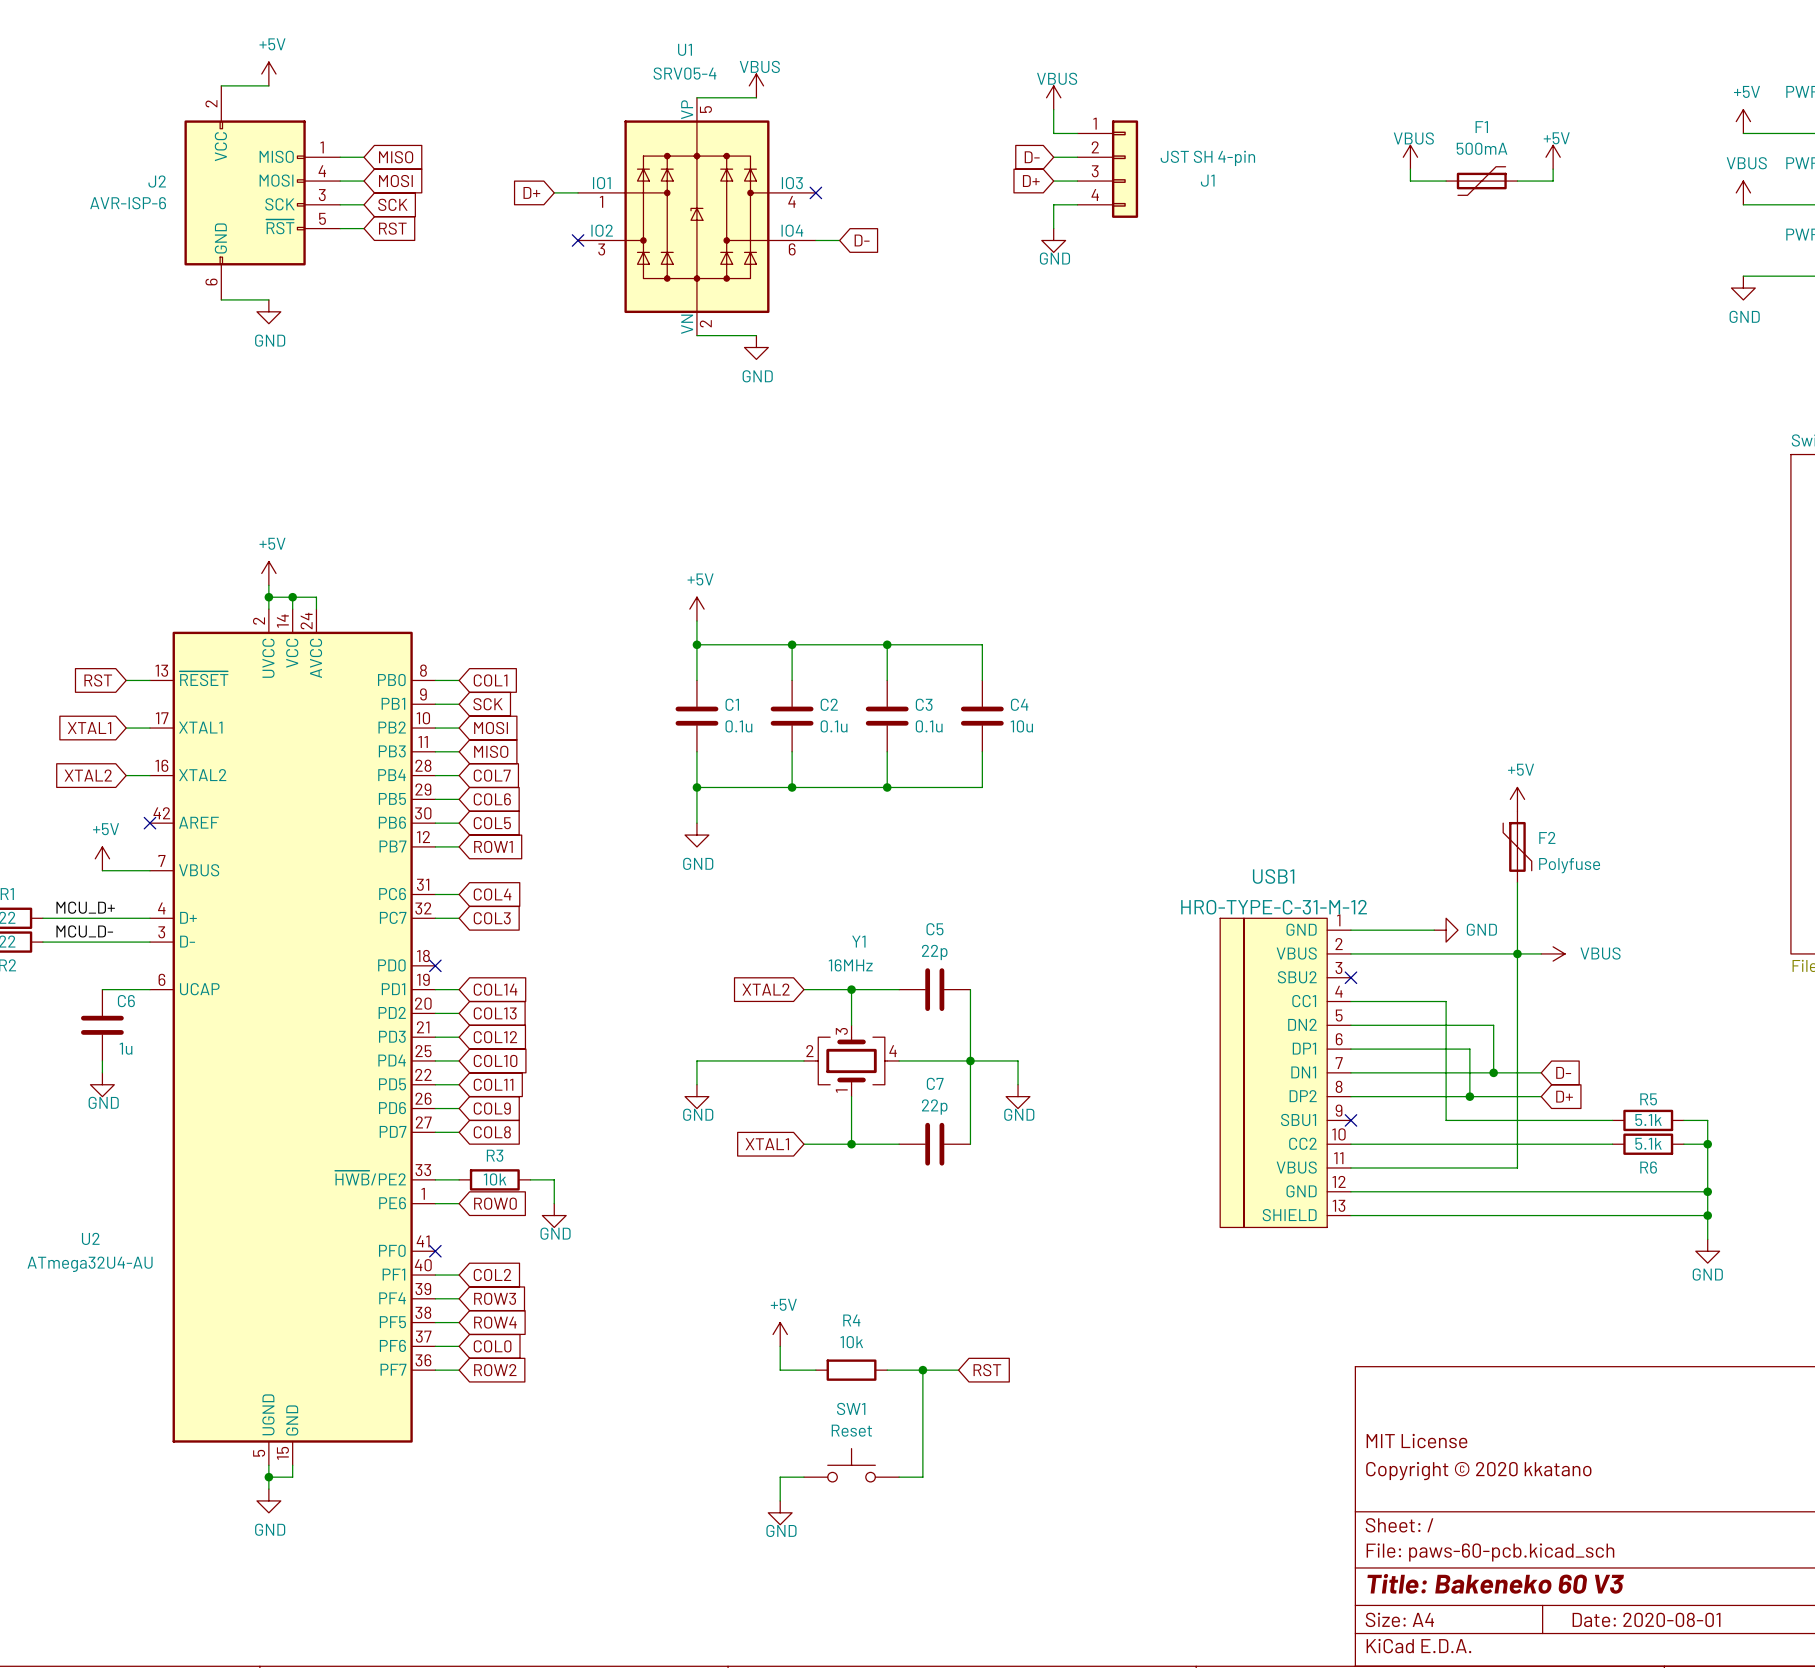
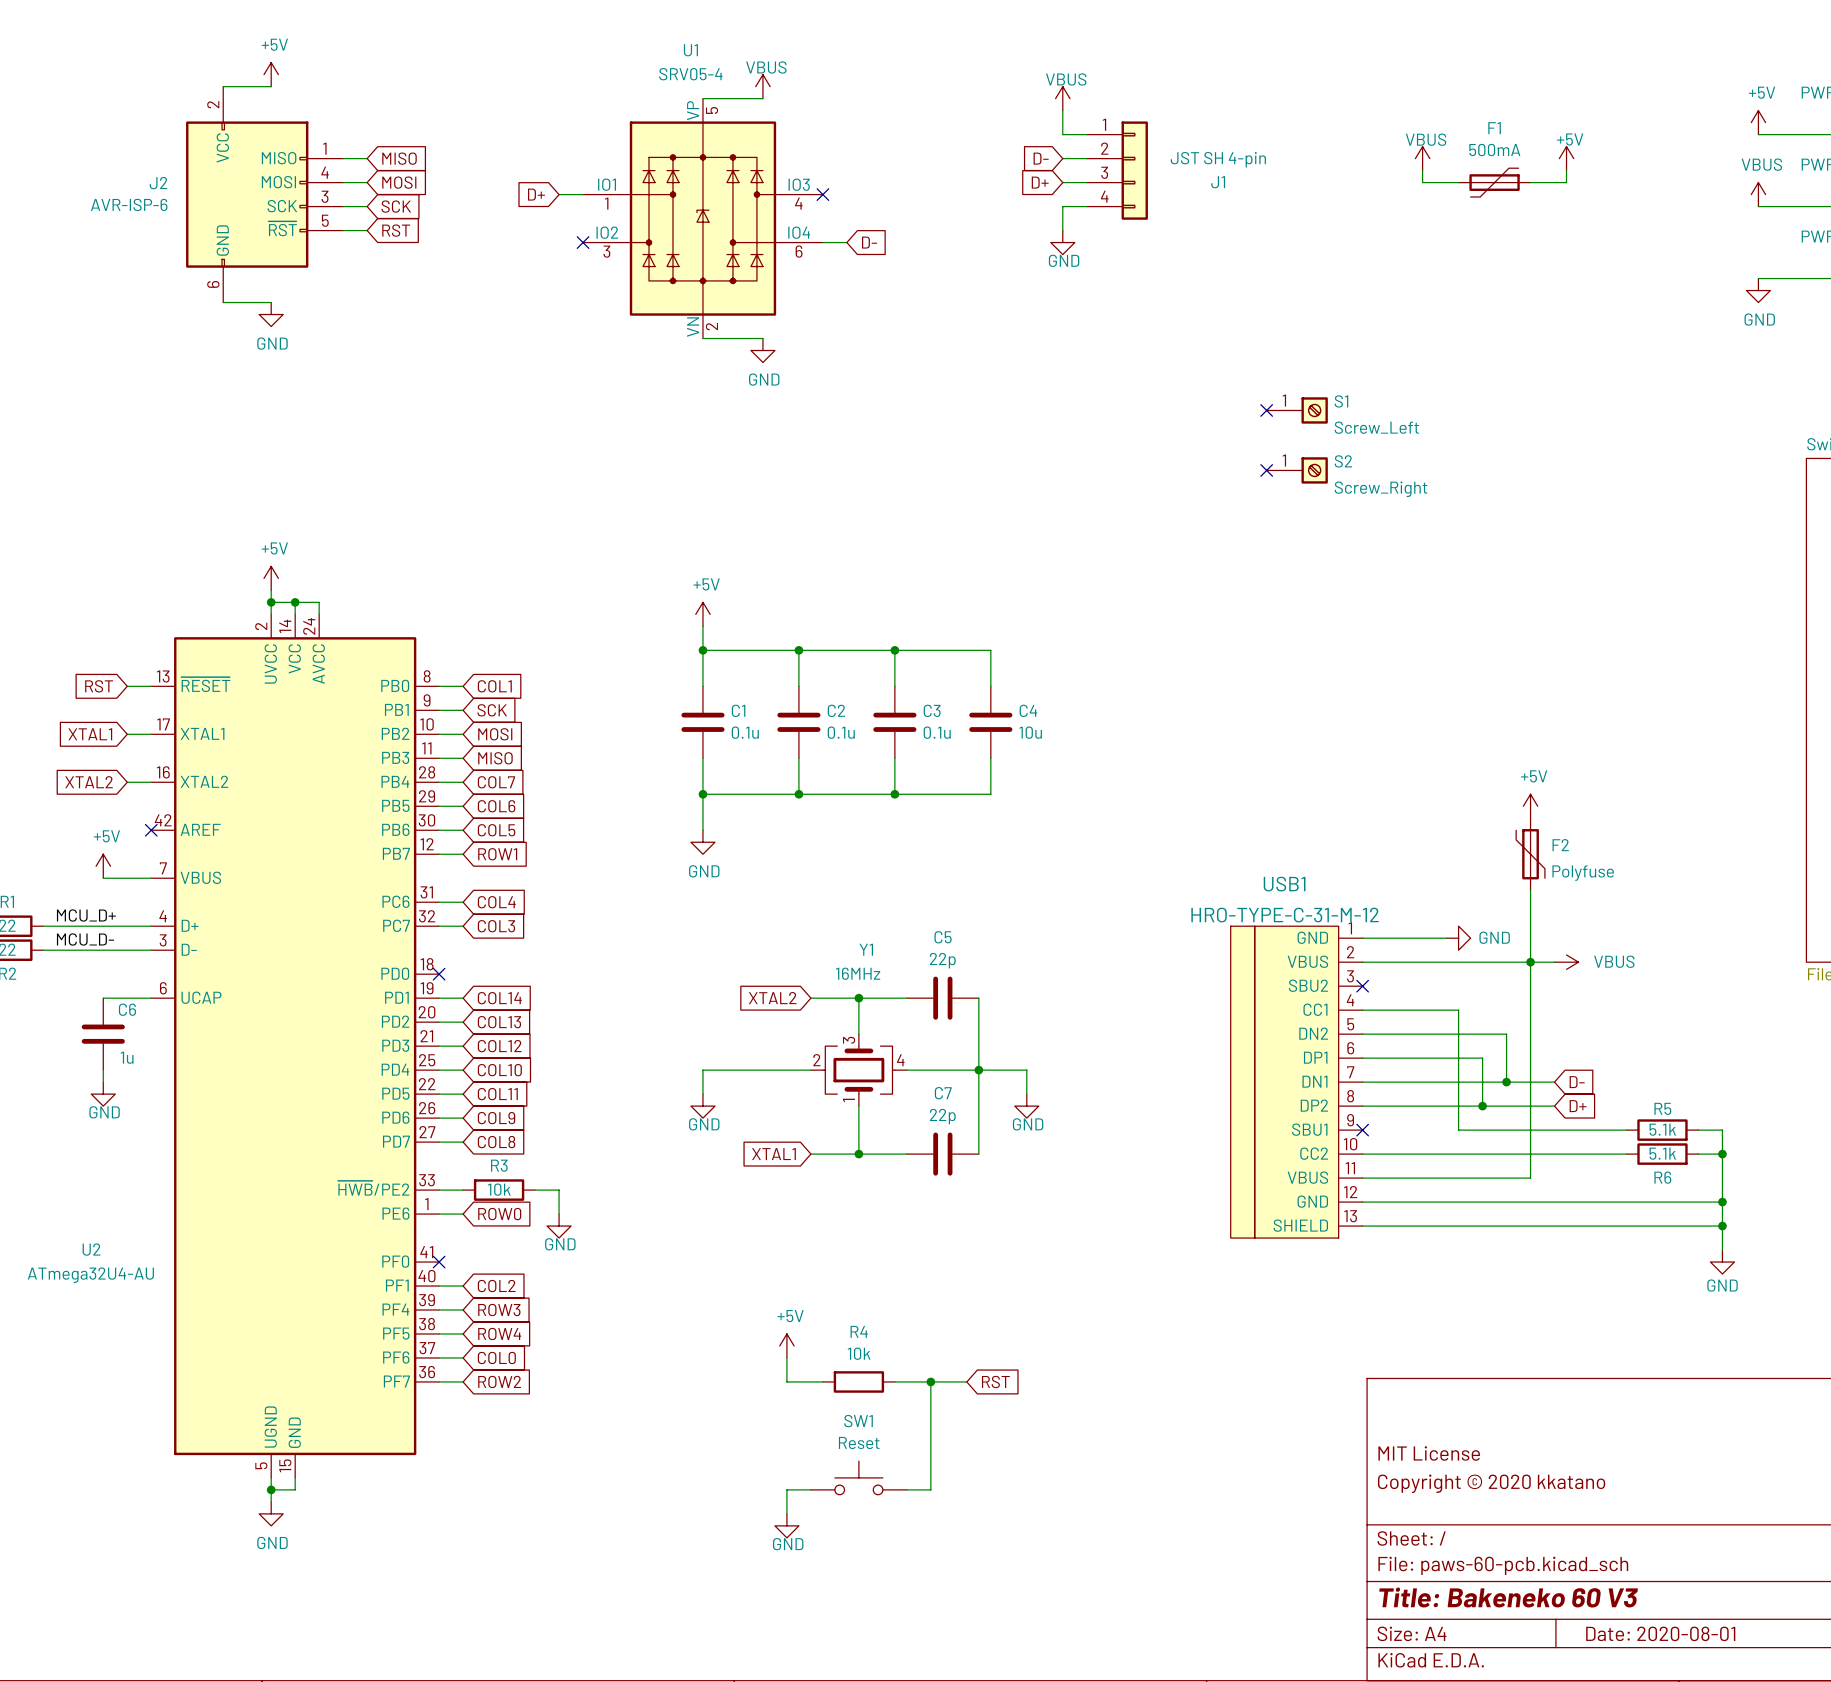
no-connect mark: none -> (1266, 410)
S1: none -> Screw_Left (1297, 410)
no-connect mark: none -> (1266, 470)
S2: none -> Screw_Right (1297, 470)

